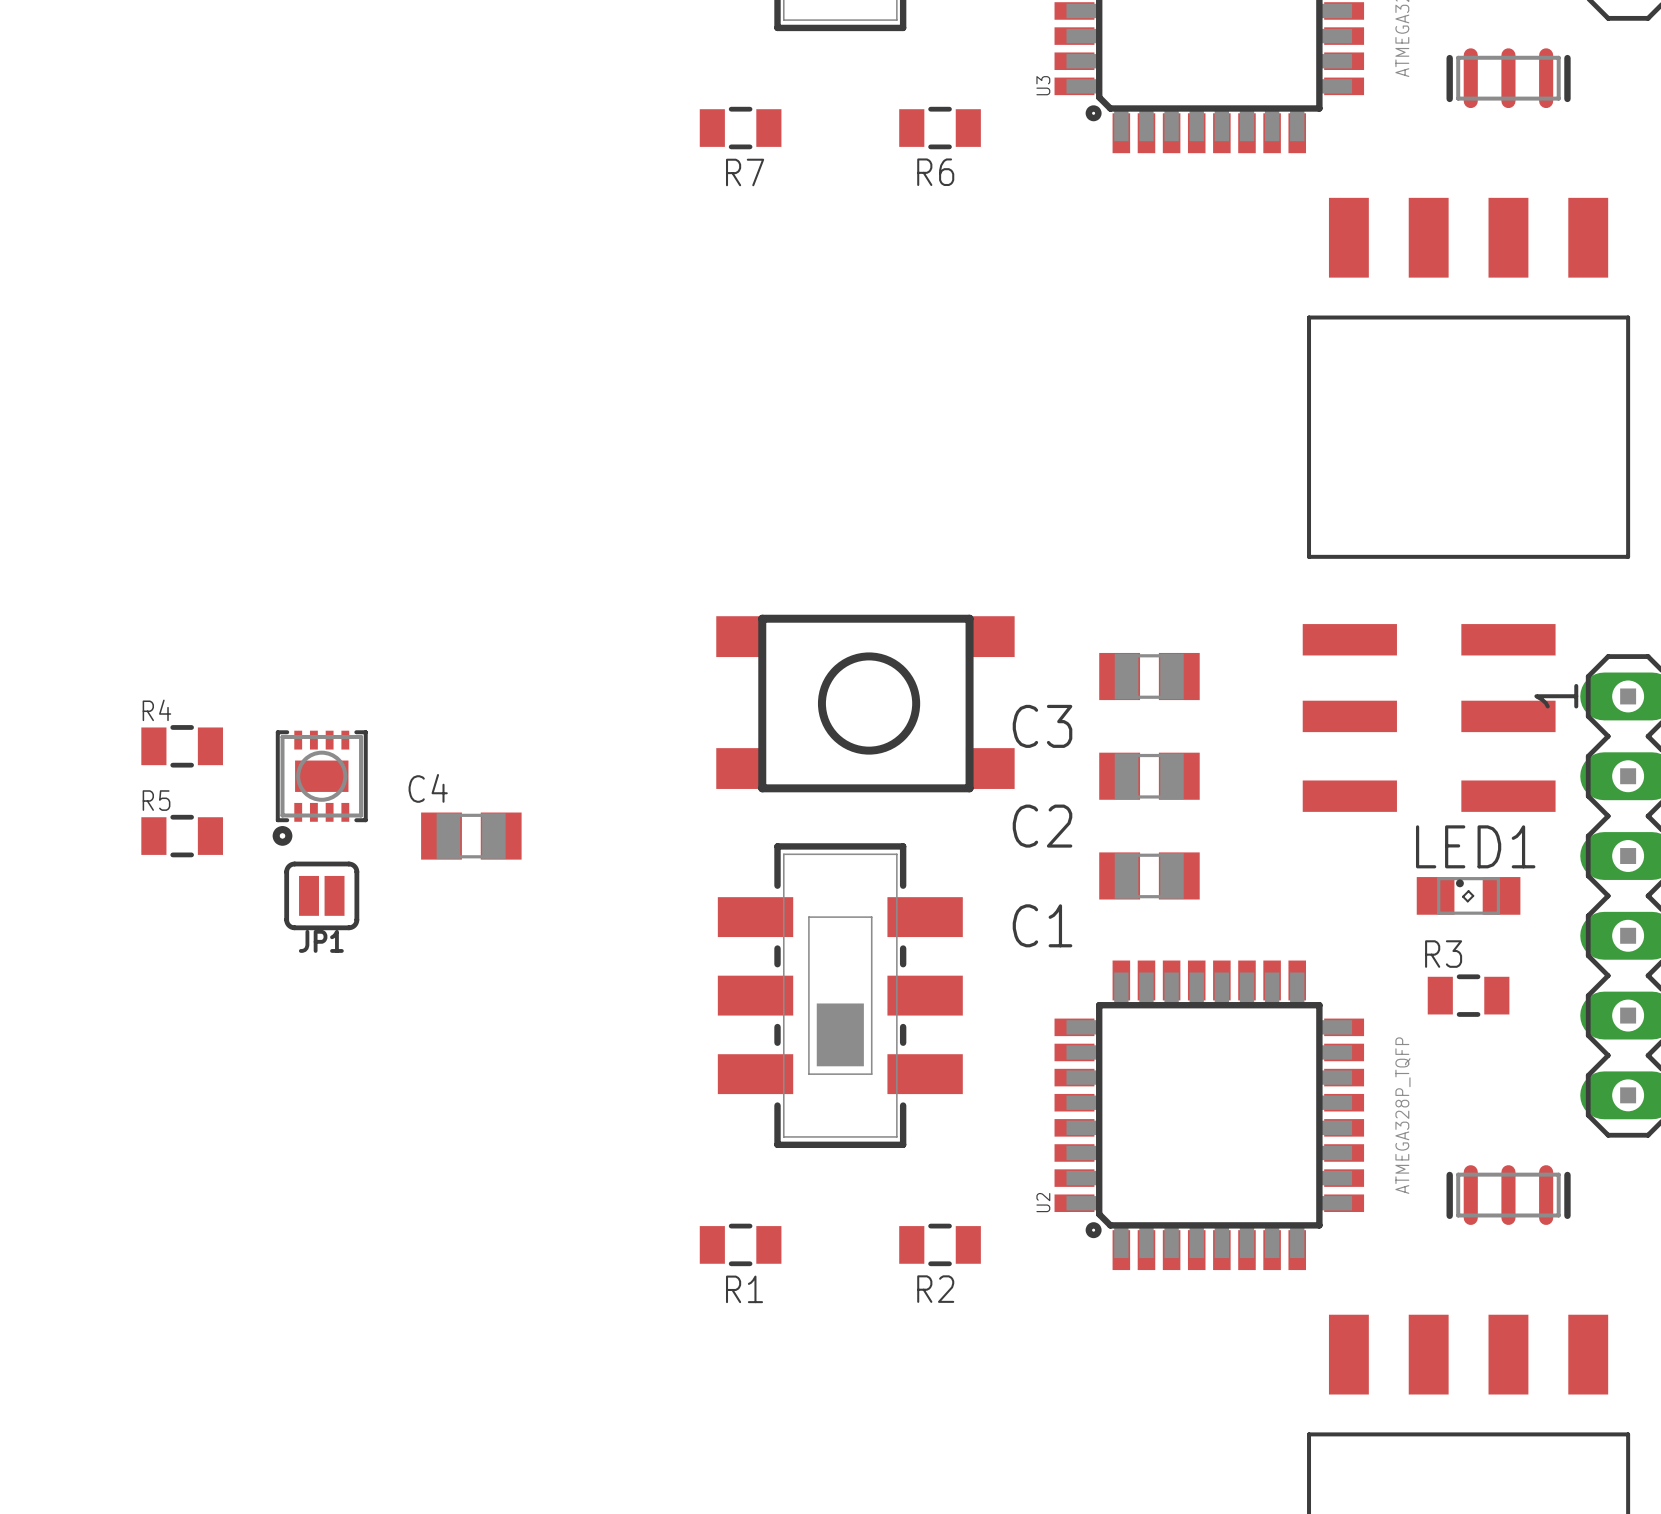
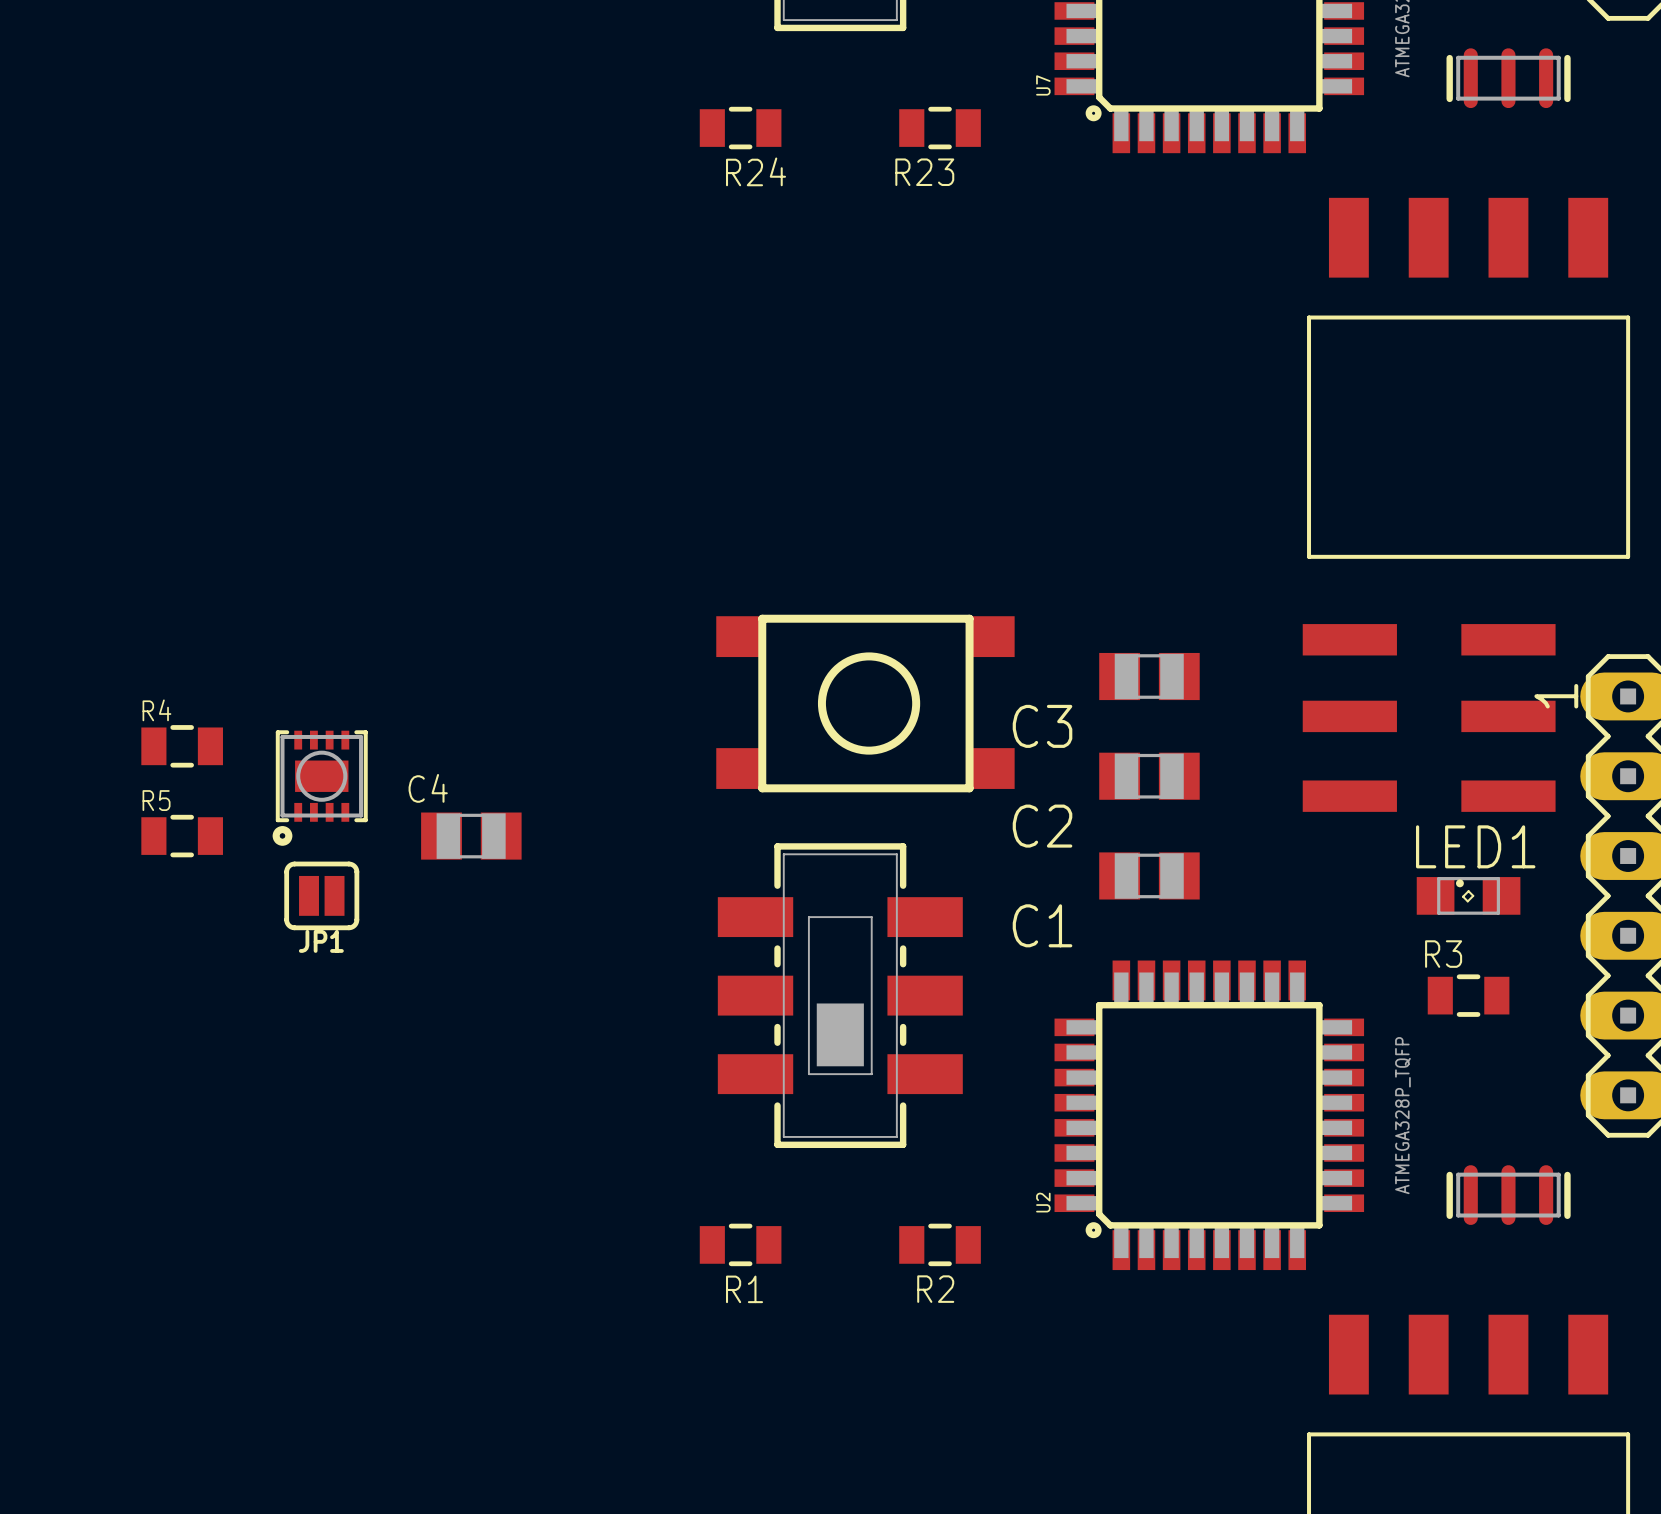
U3 name: U3 (1043, 85) -> U7 (1043, 85)
R7 name: R7 (745, 172) -> R24 (756, 171)
R6 name: R6 (935, 172) -> R23 (924, 172)

